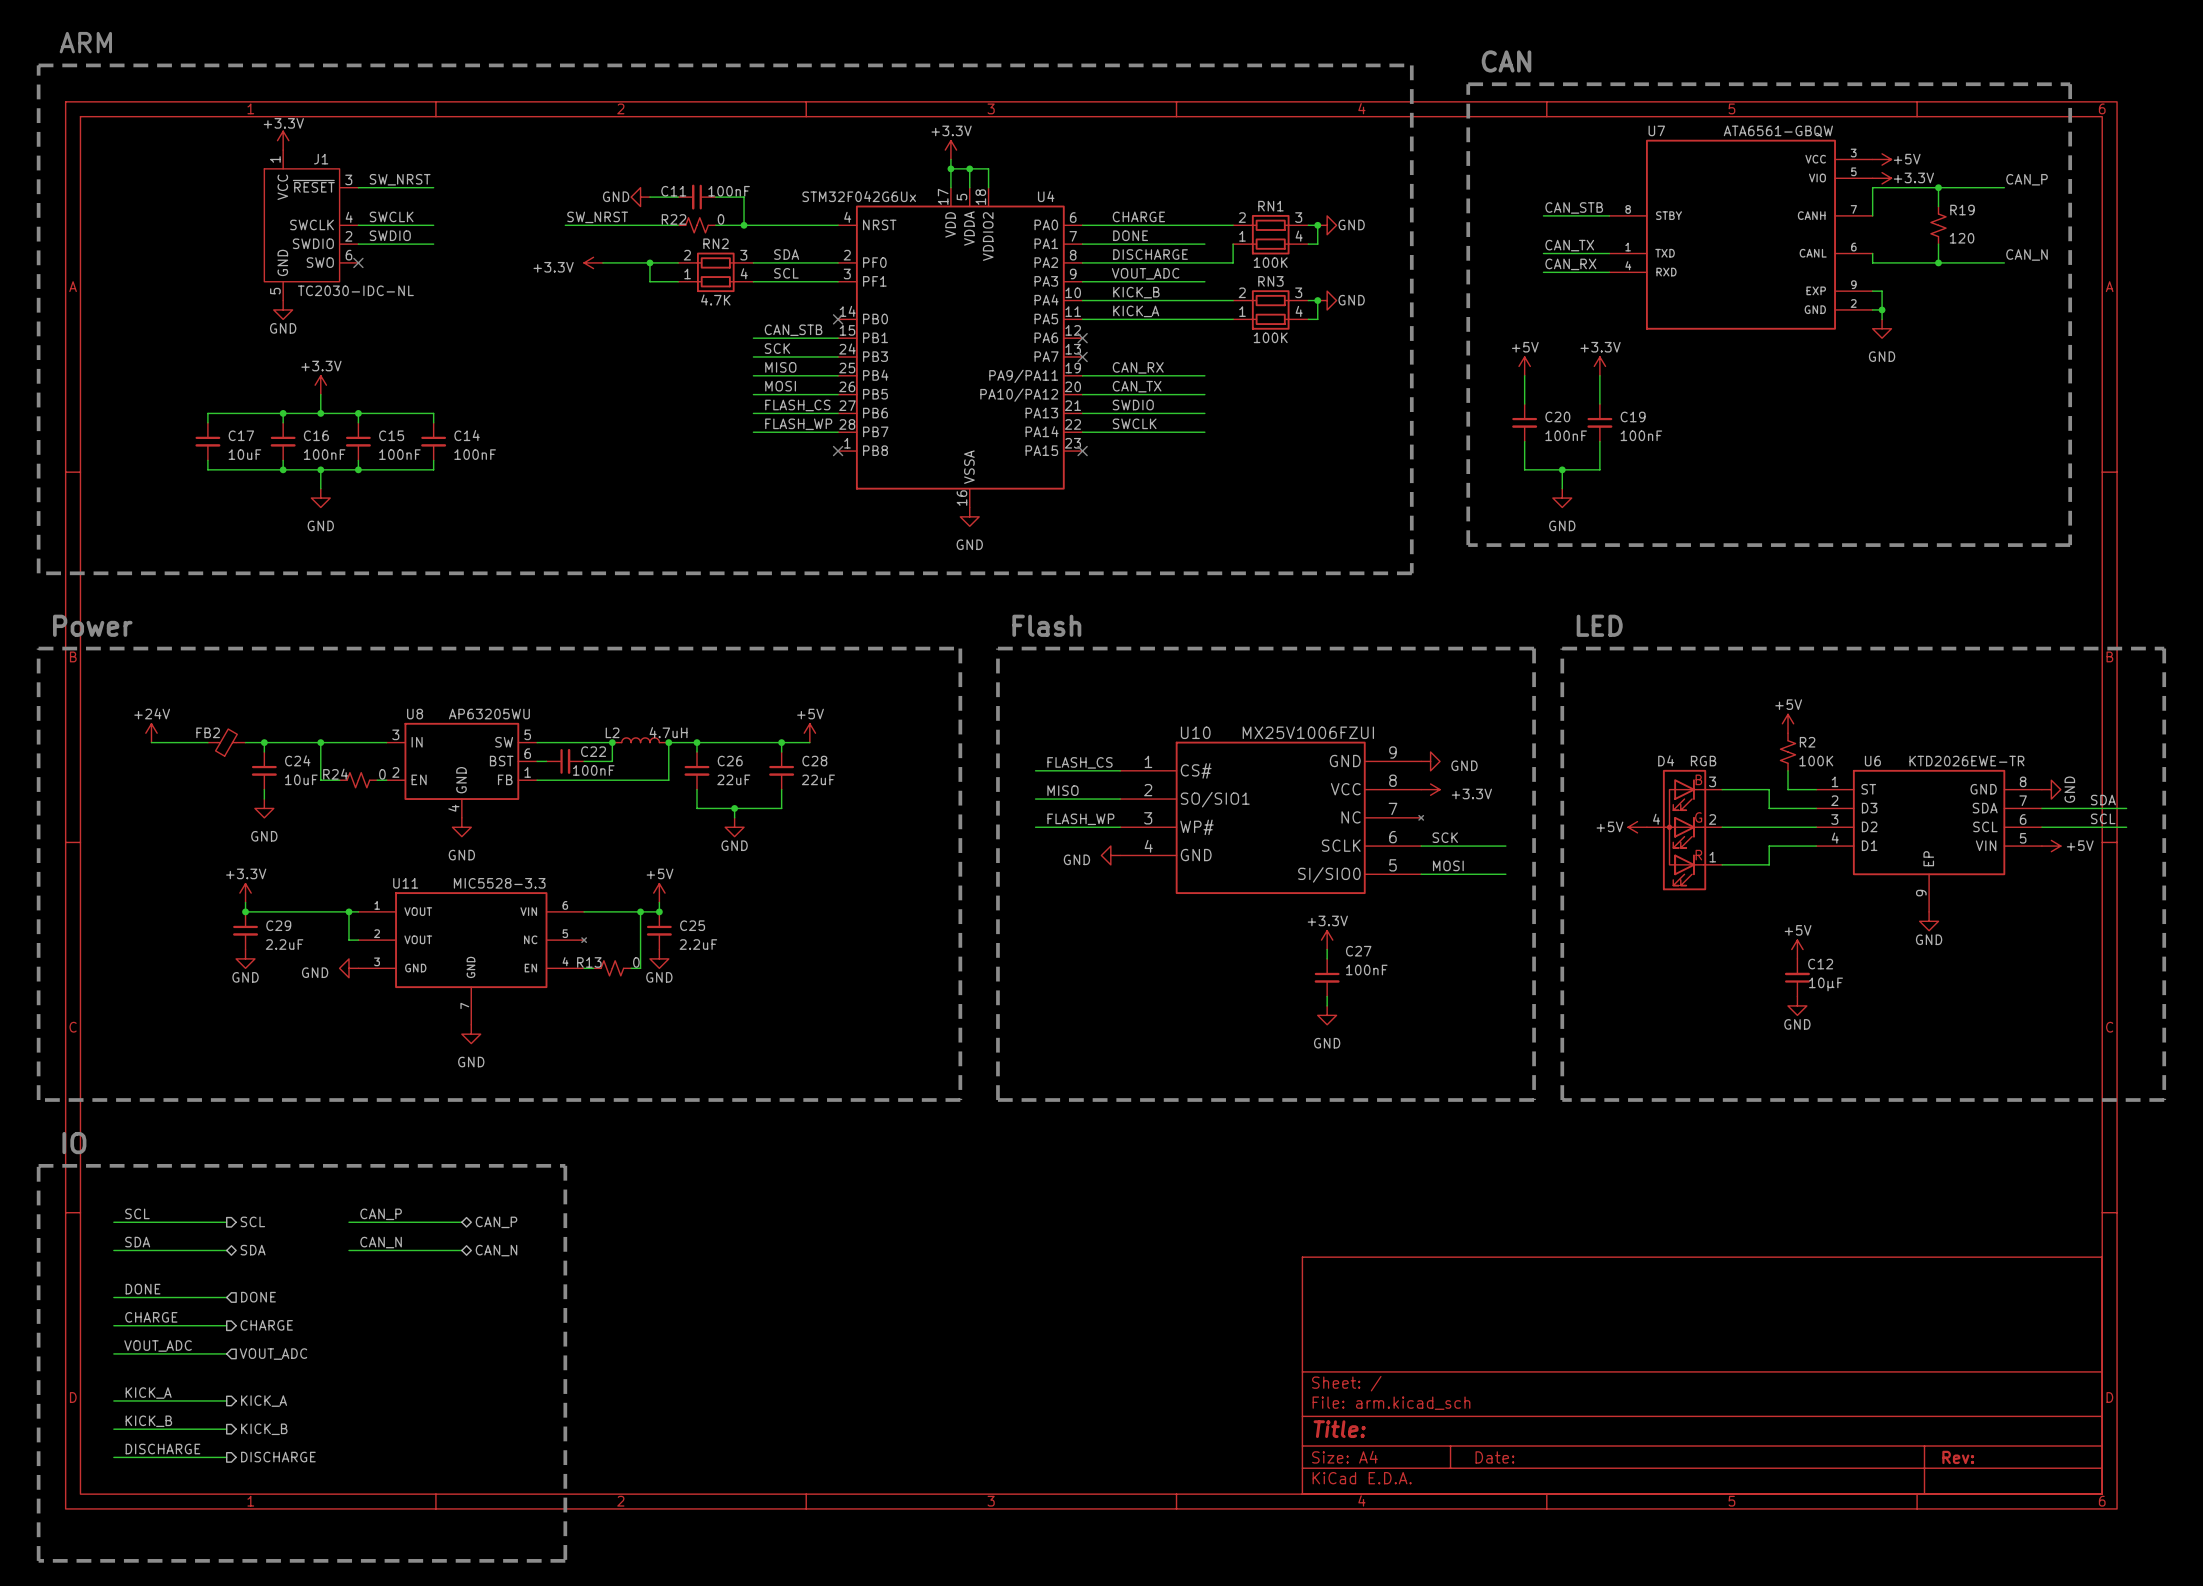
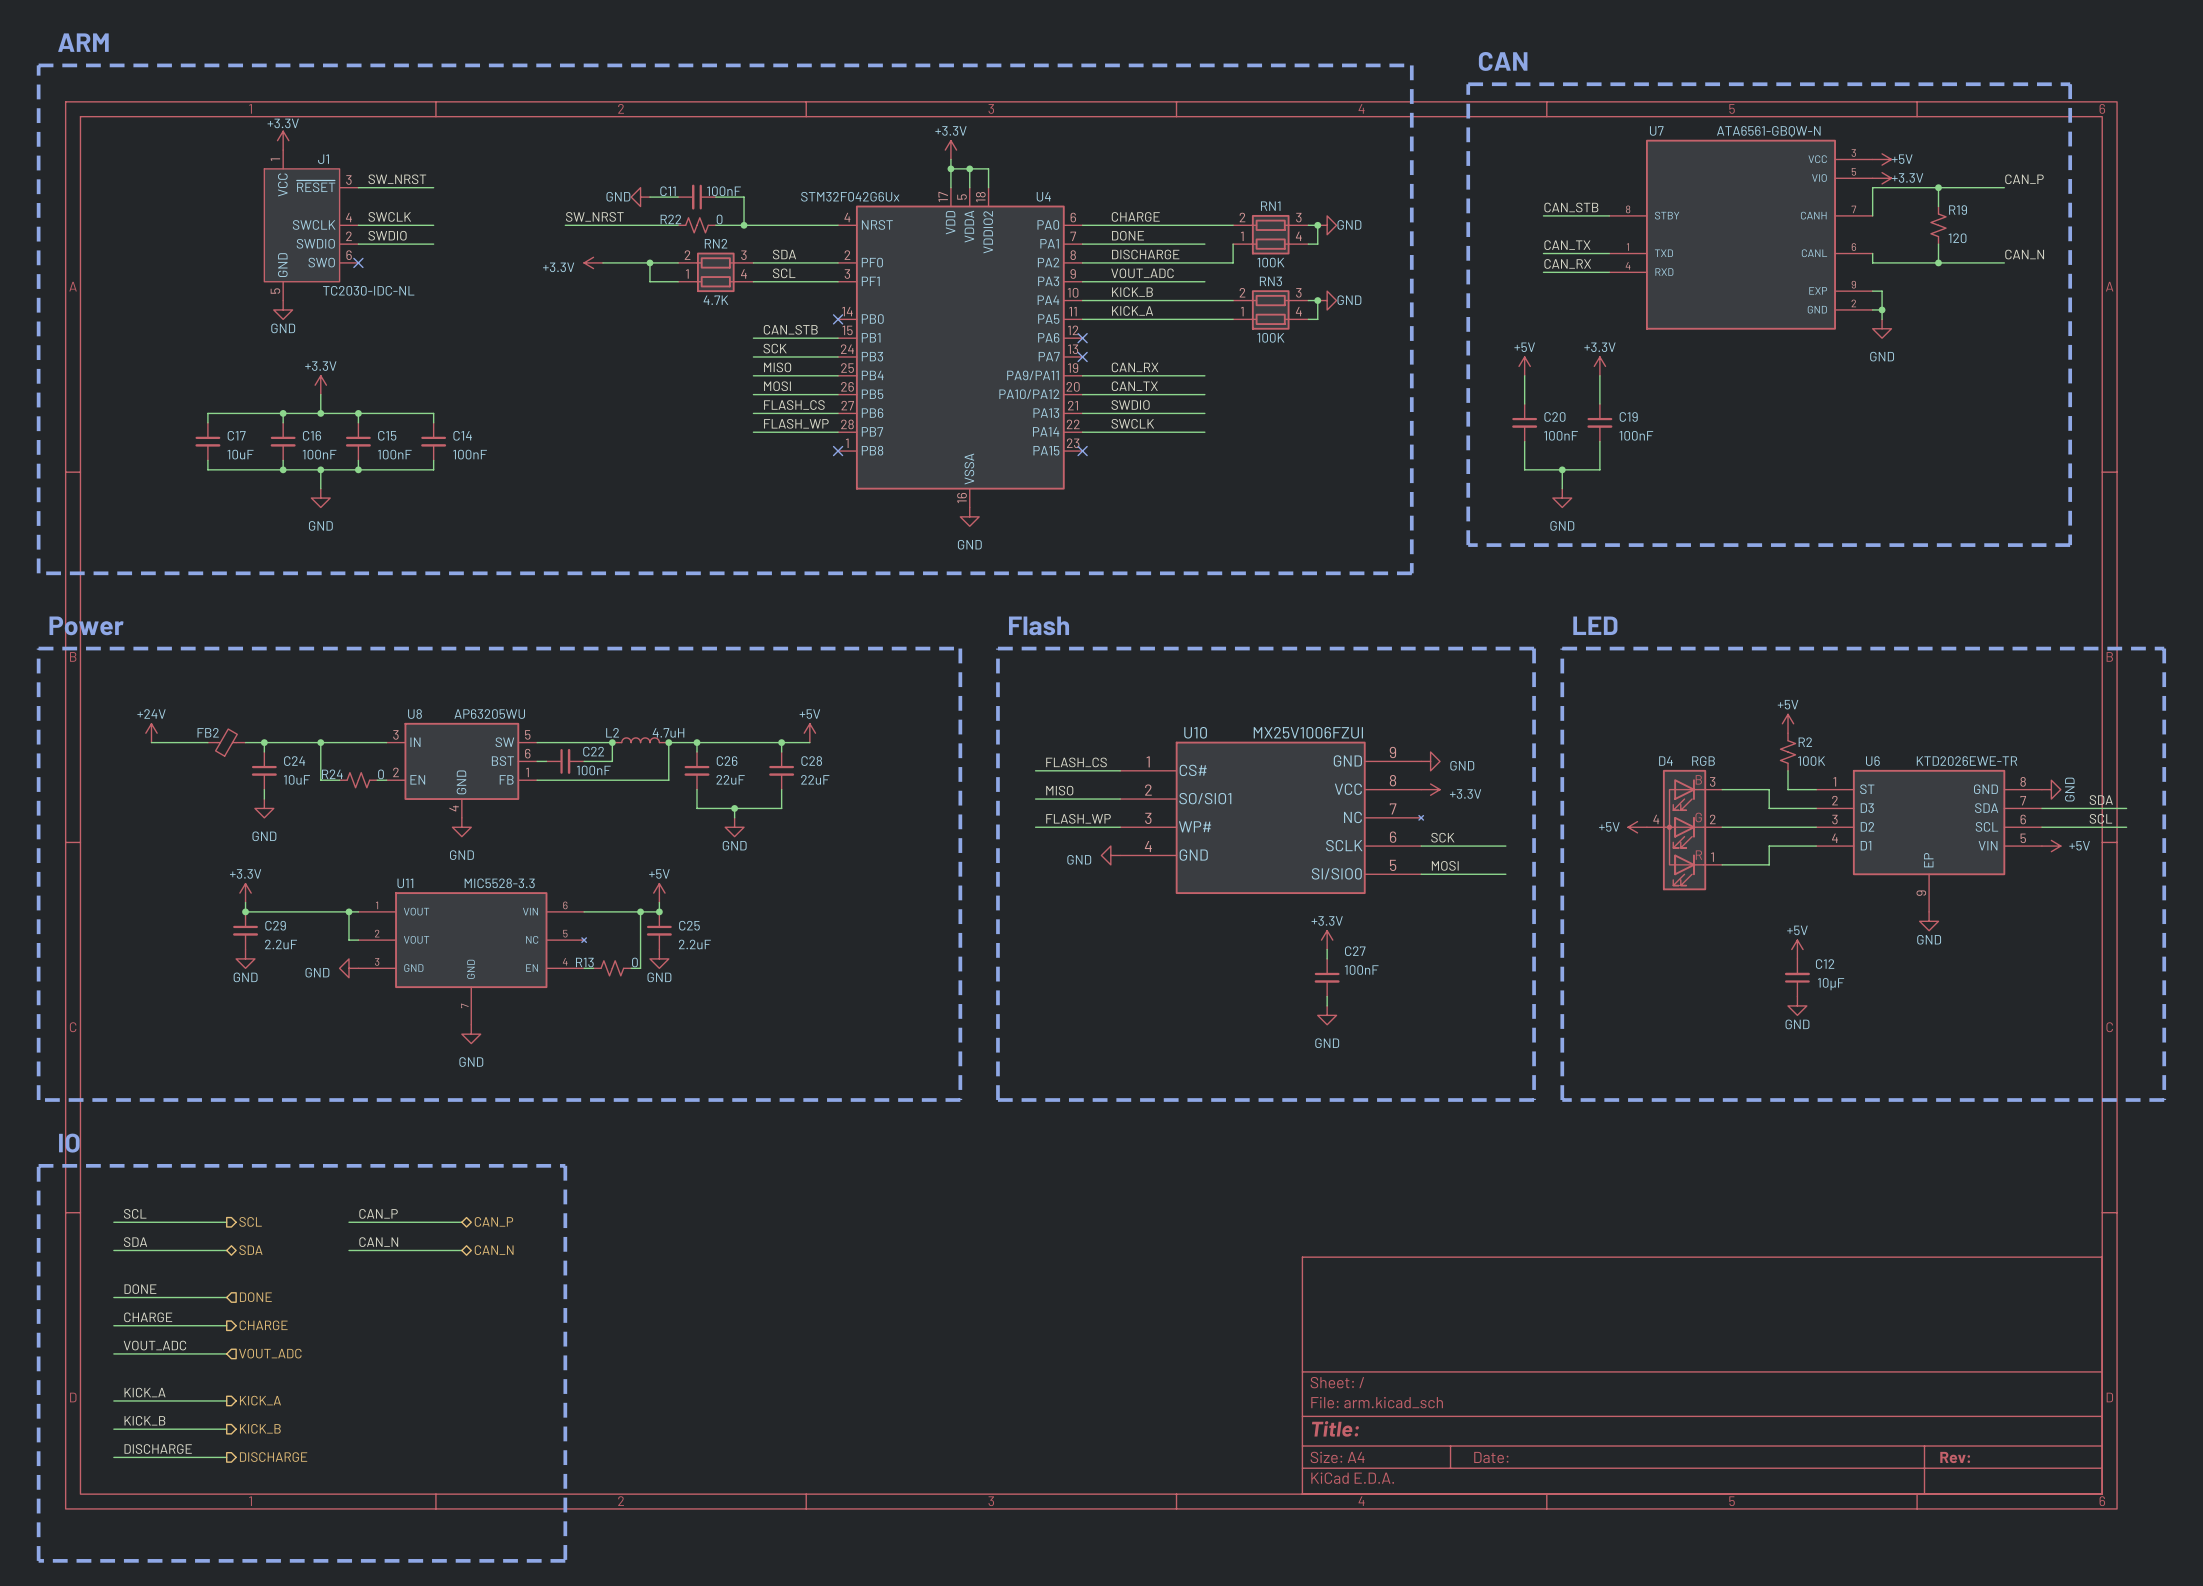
U7 value: ATA6561-GBQW (1778, 131) -> ATA6561-GBQW-N (1768, 131)

